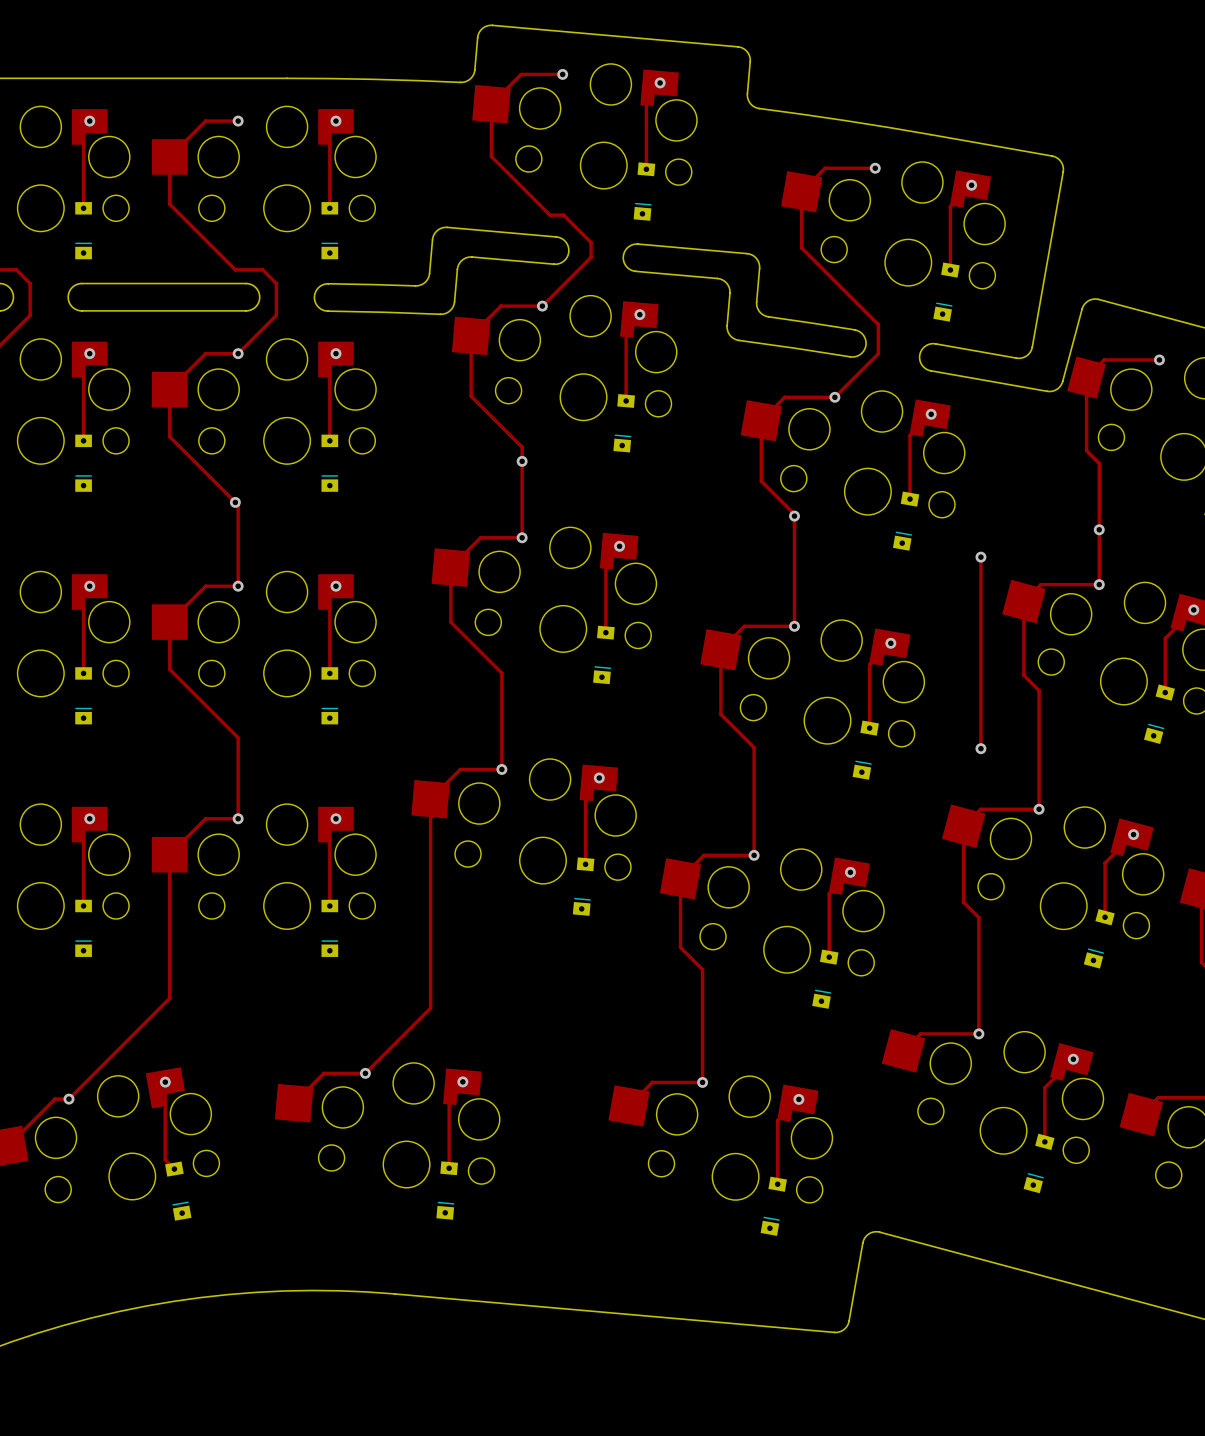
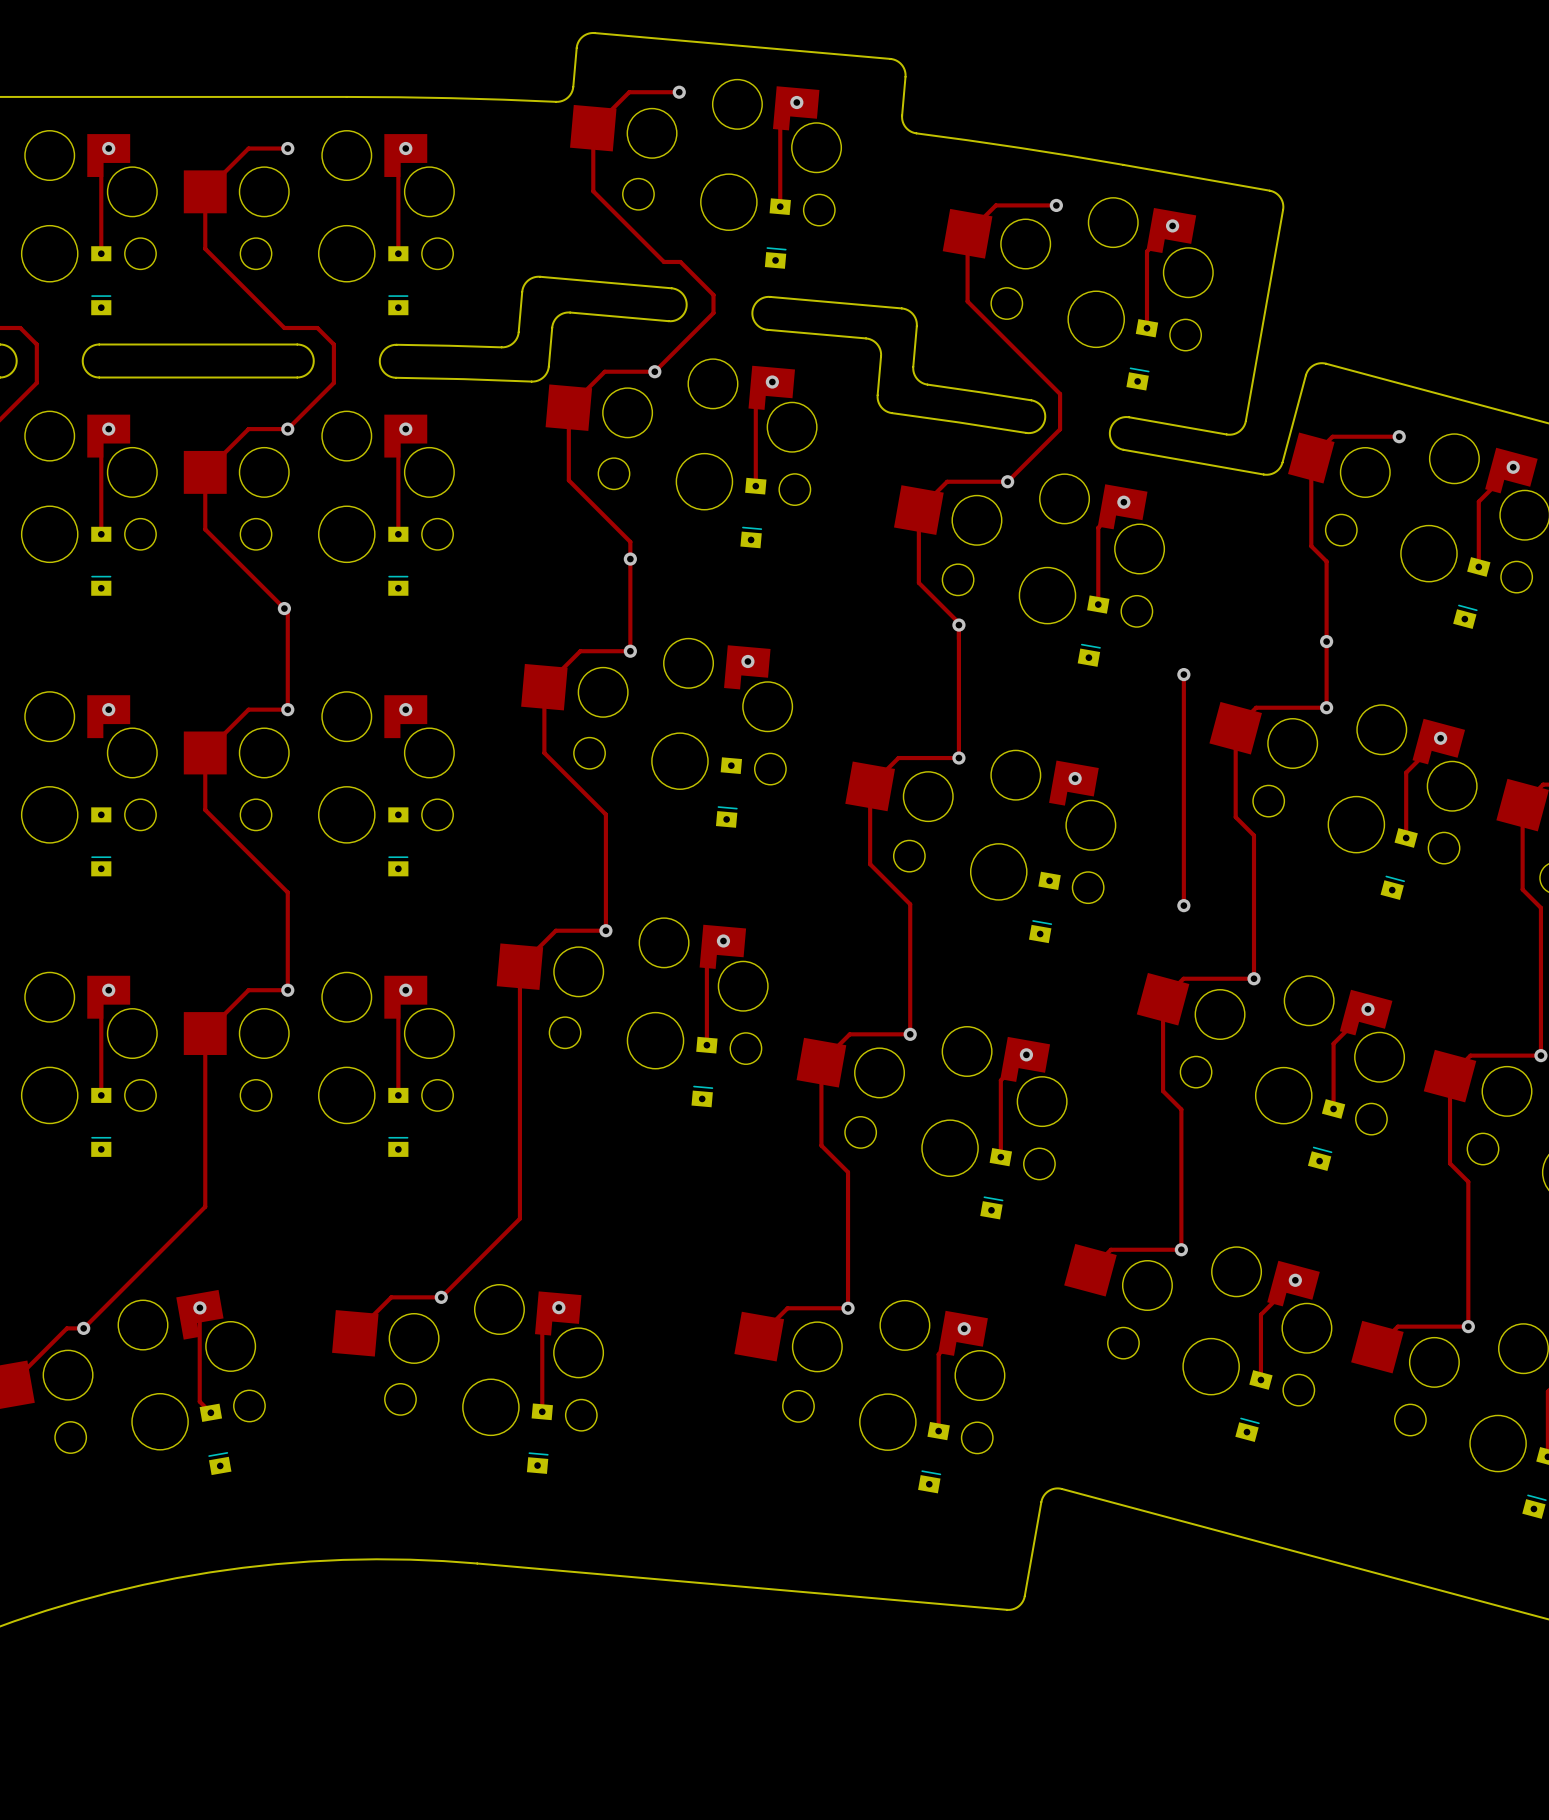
track: (619, 546) (605, 560) (605, 632) -> none
track: (89, 586) (83, 592) (83, 673) -> none
track: (335, 586) (329, 592) (329, 673) -> none
track: (890, 643) (869, 664) (869, 728) -> none

